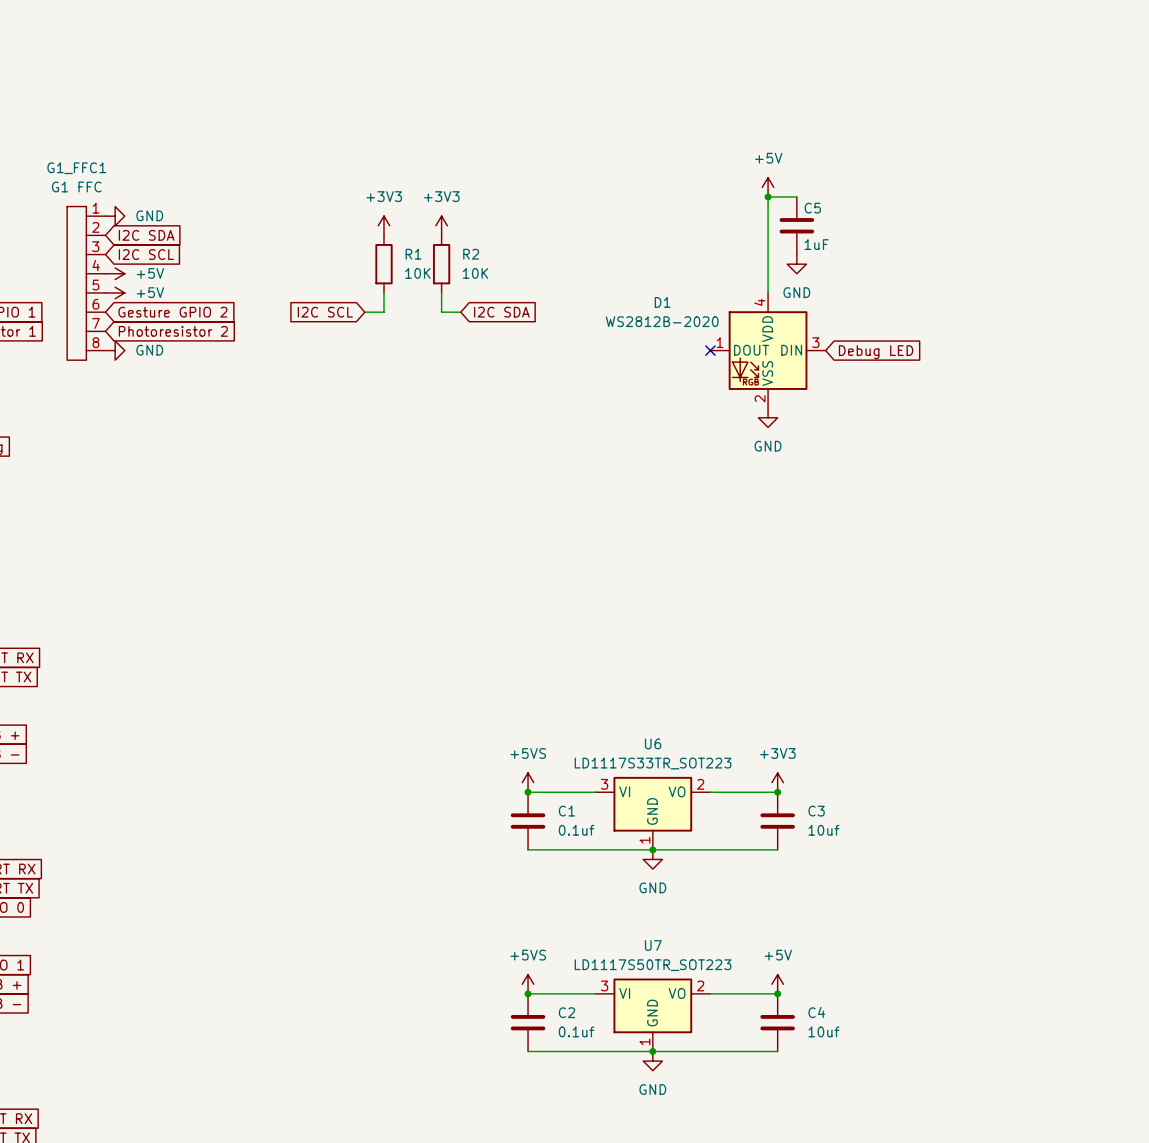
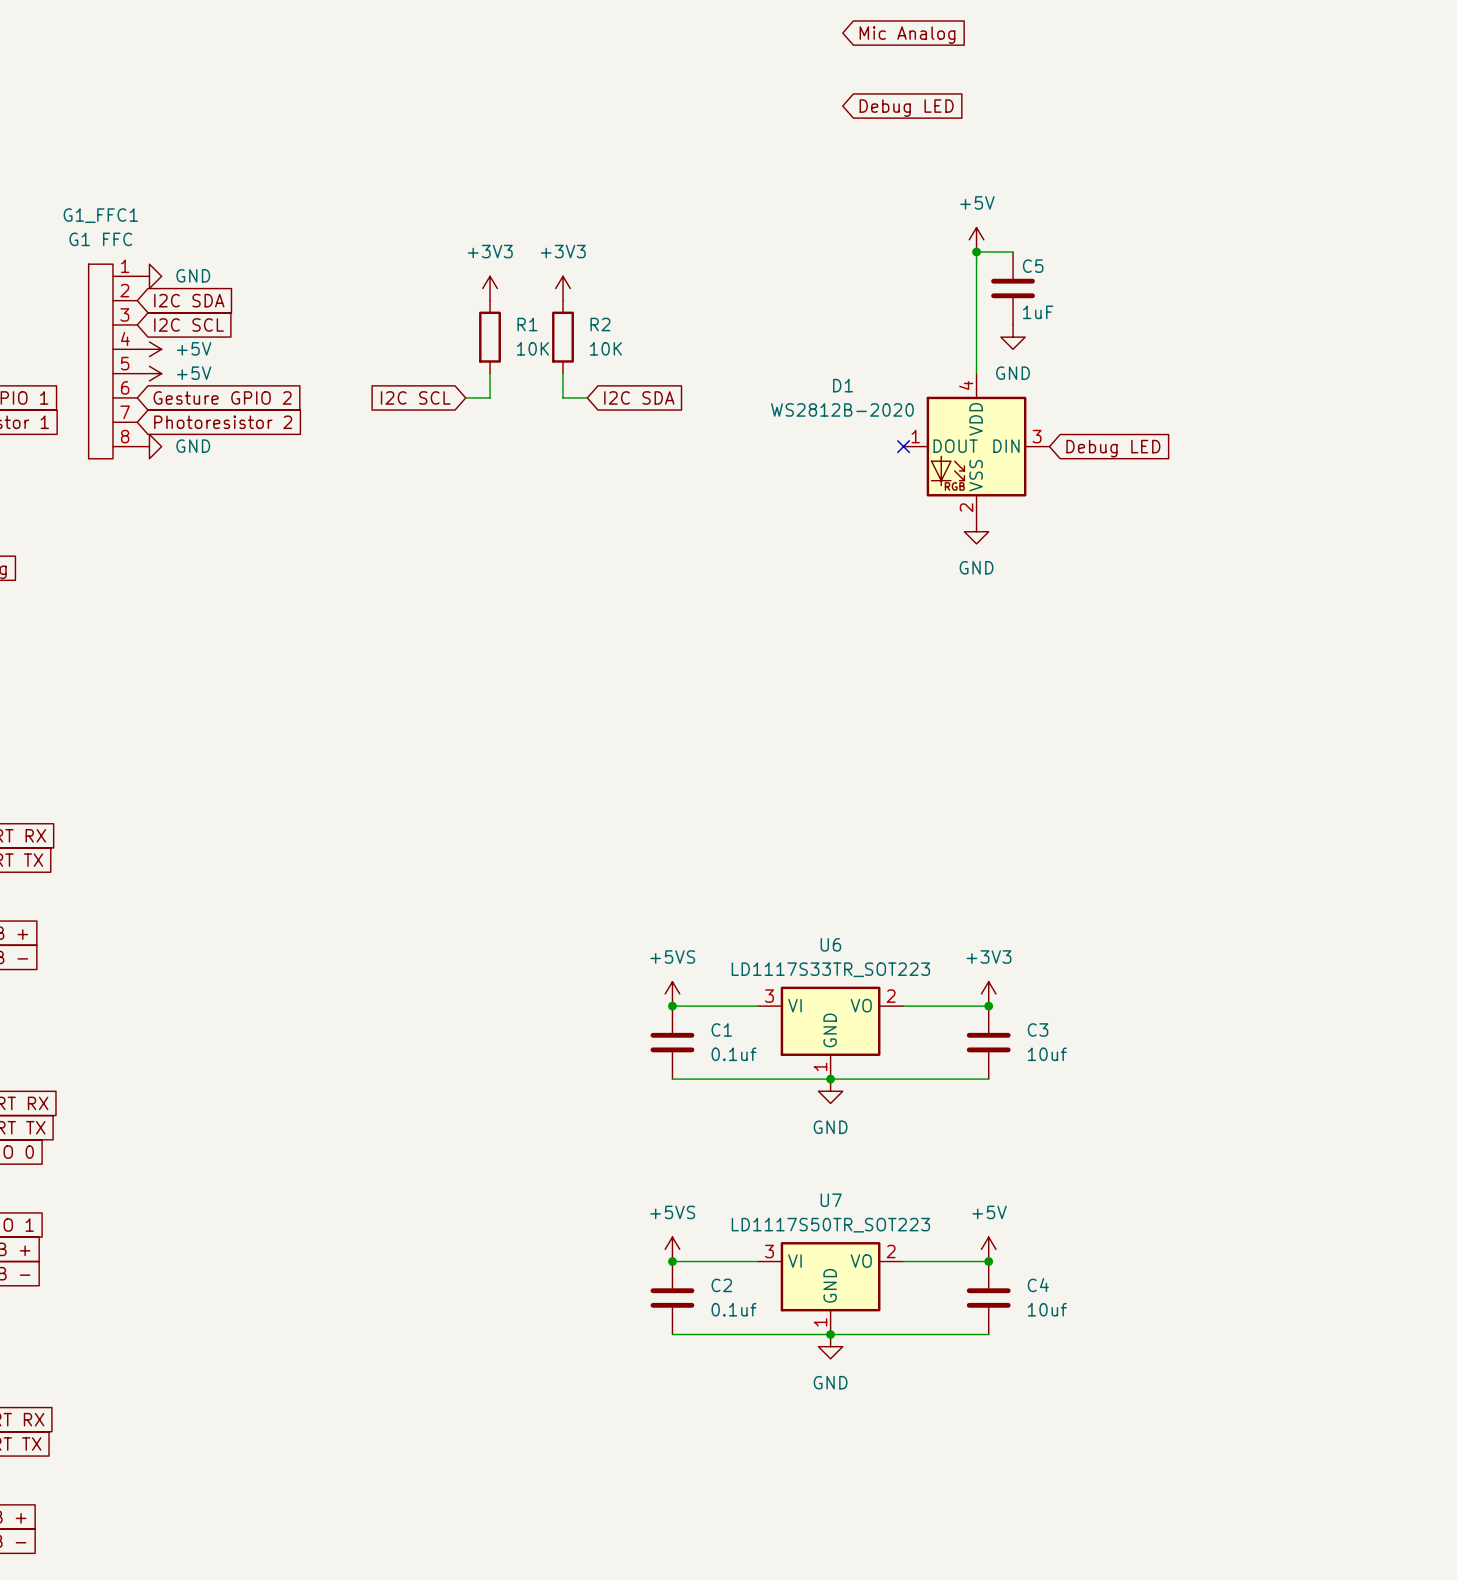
global label: none -> Mic Analog (907, 35)
global label: none -> Debug LED (906, 108)

